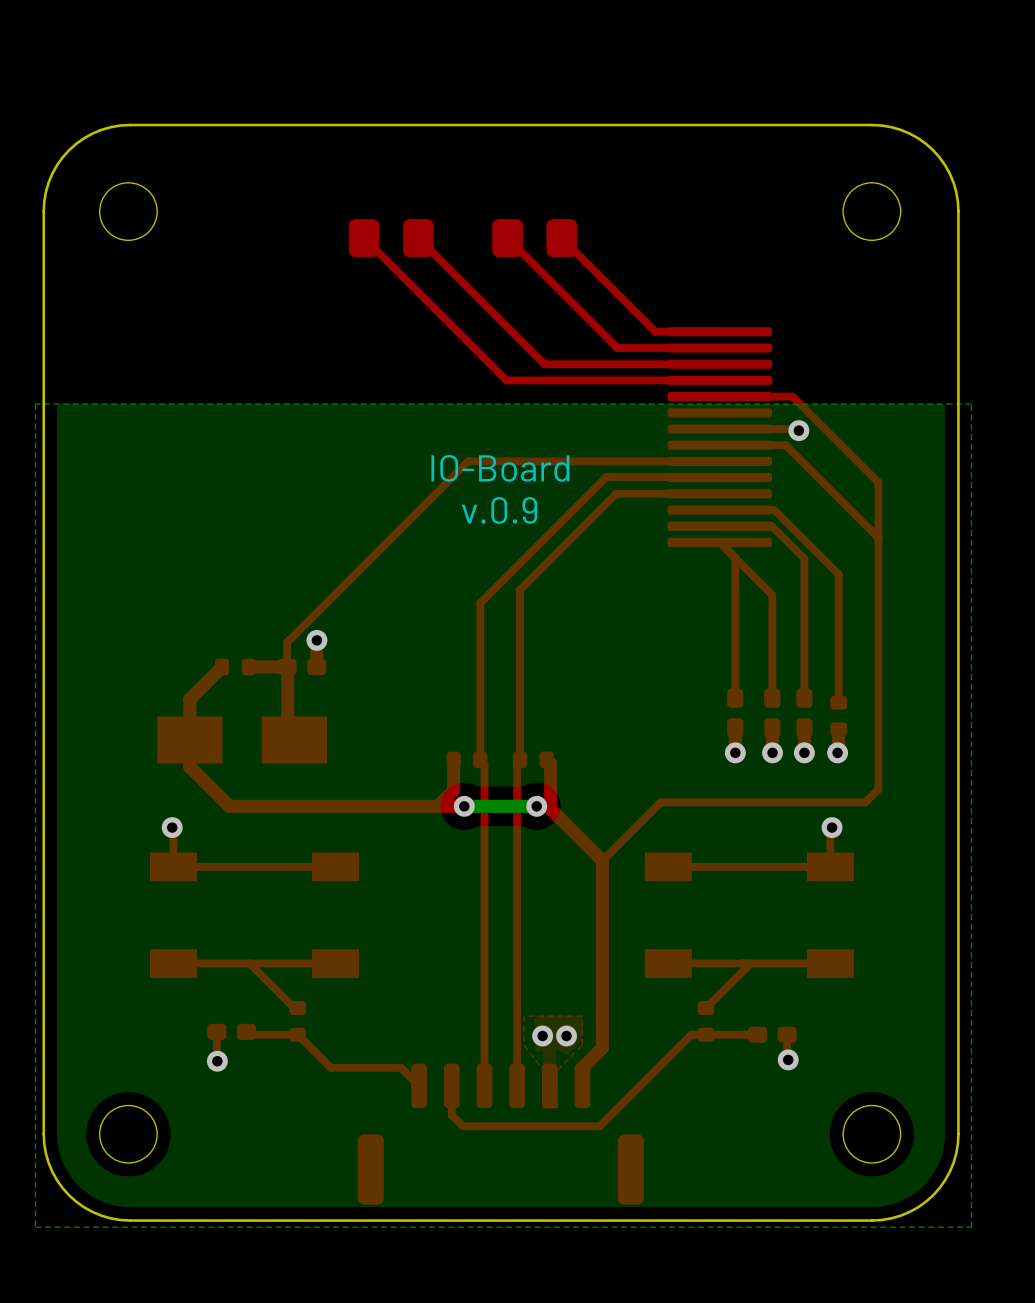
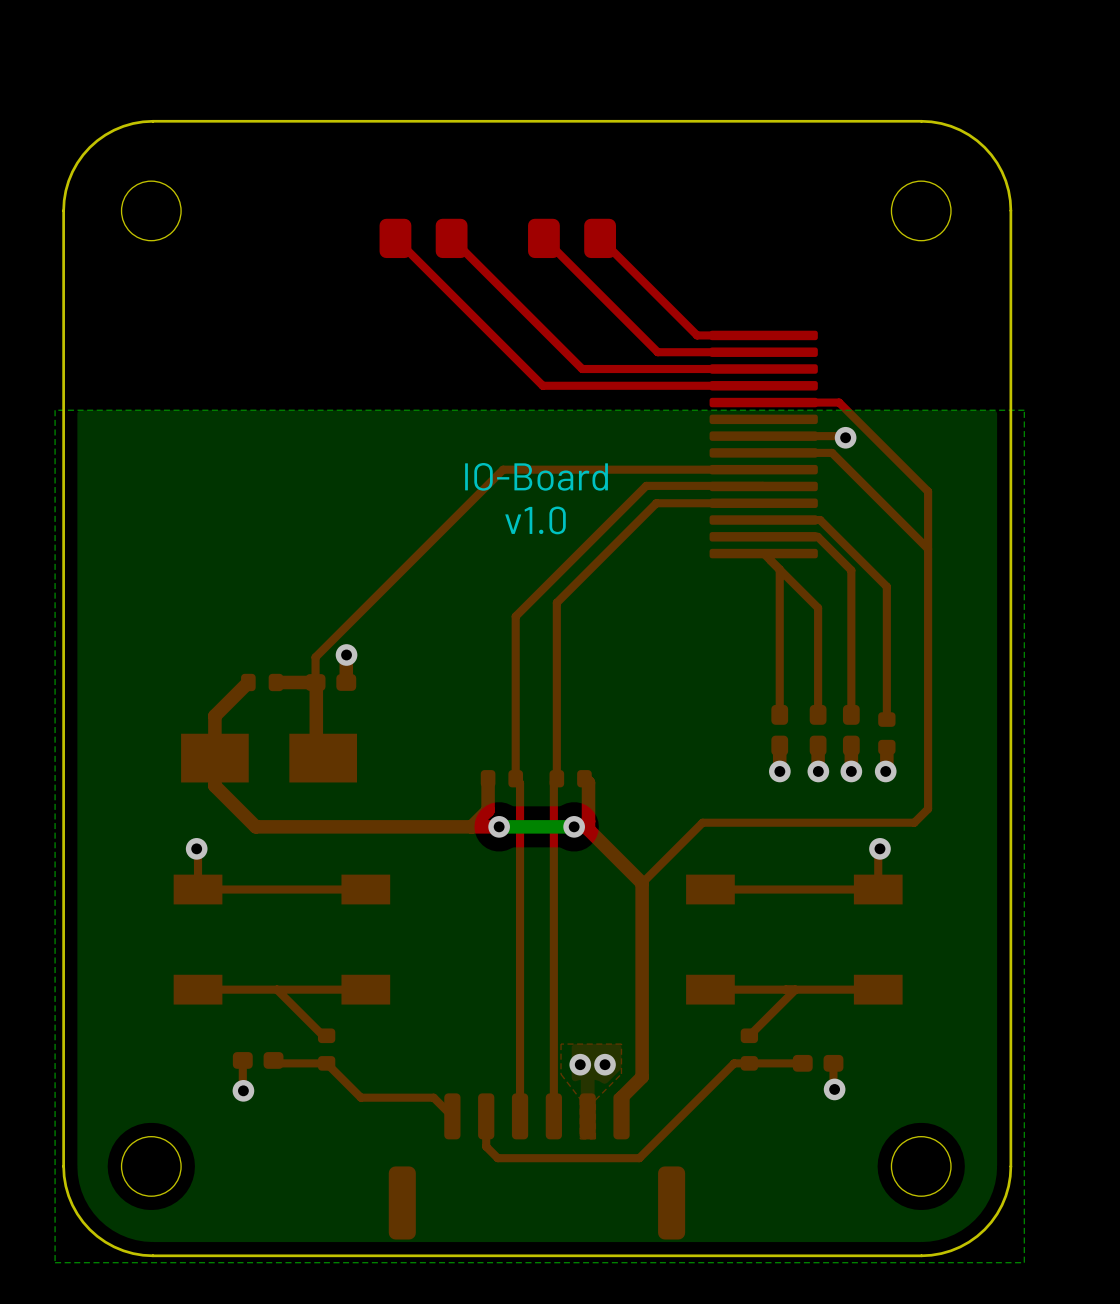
text: v.0.9 (499, 510) -> v1.0 (535, 520)

